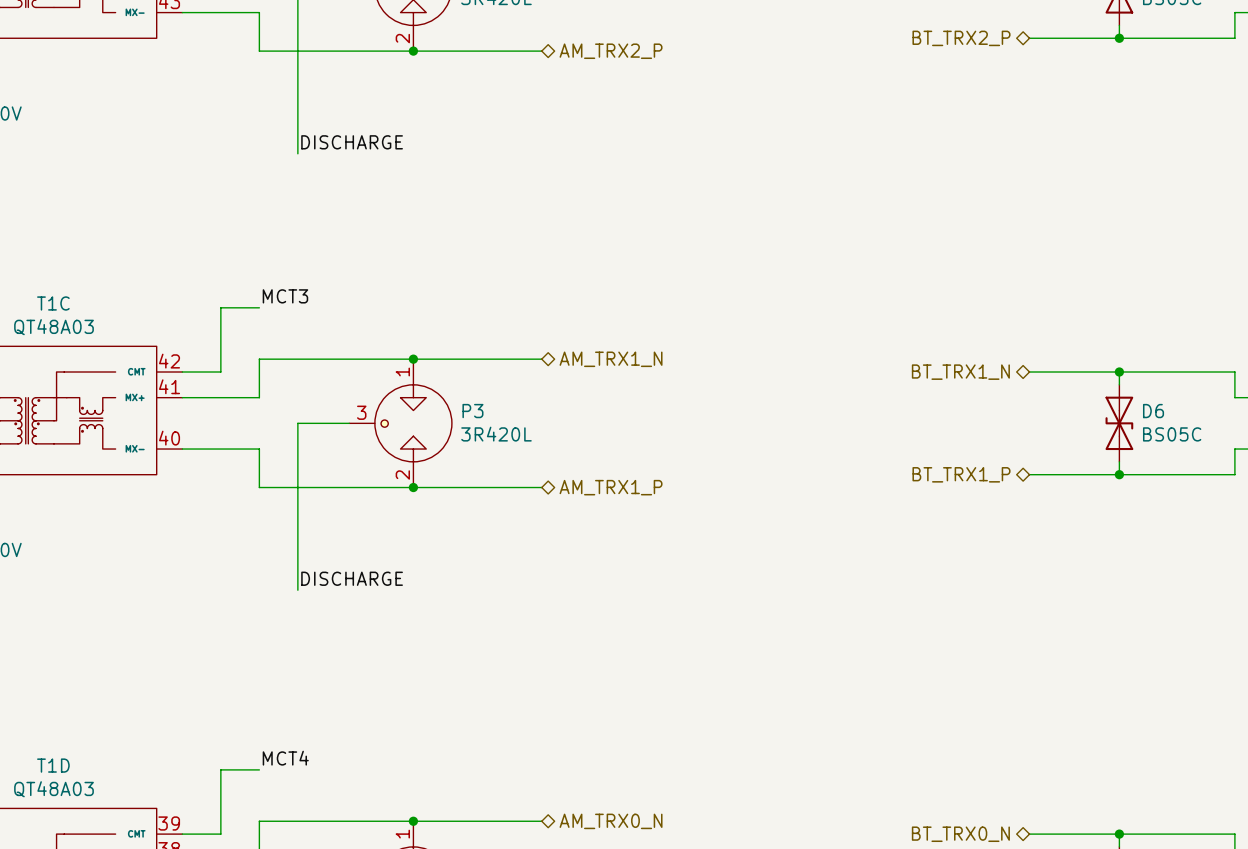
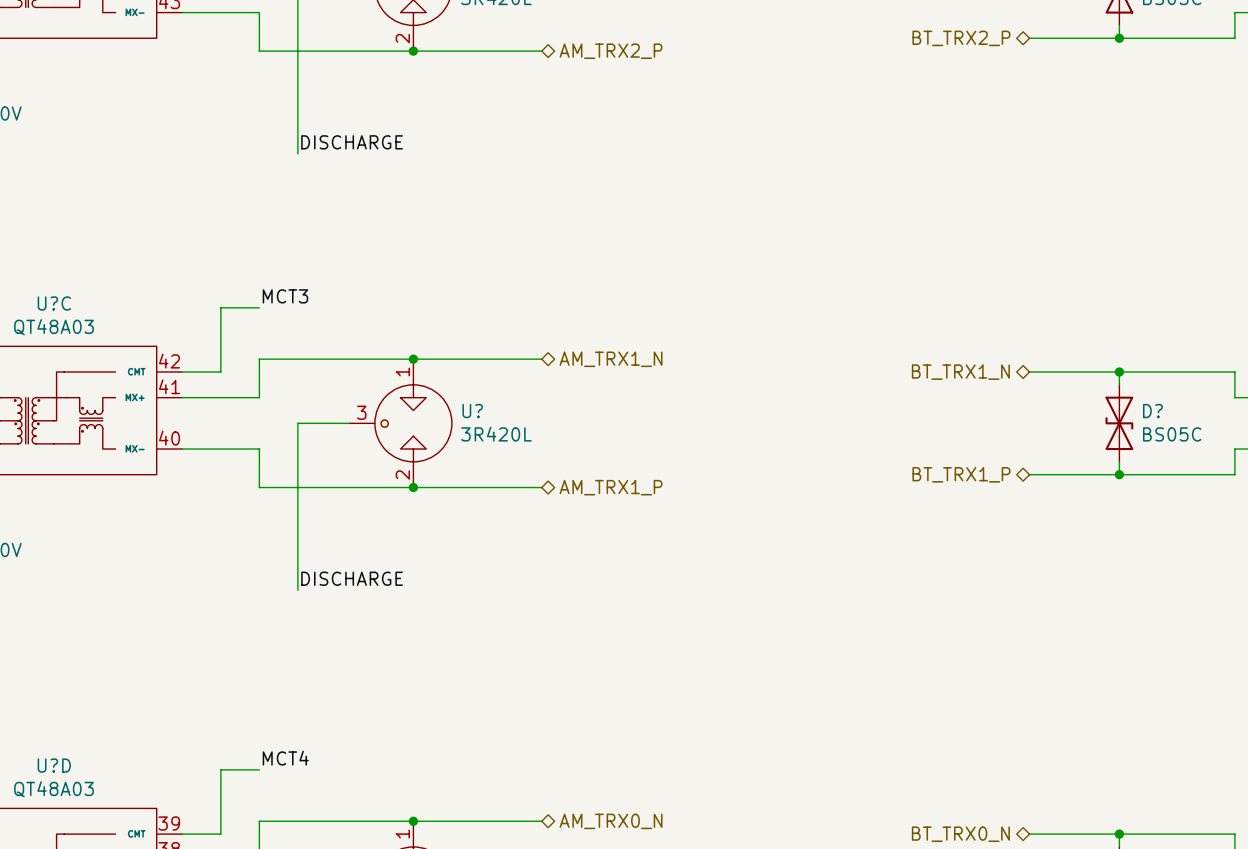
T1C name: T1C (53, 303) -> U?C (54, 303)
P3 name: P3 (472, 411) -> U? (472, 411)
D6 name: D6 (1153, 411) -> D? (1152, 411)
T1D name: T1D (53, 765) -> U?D (54, 765)

